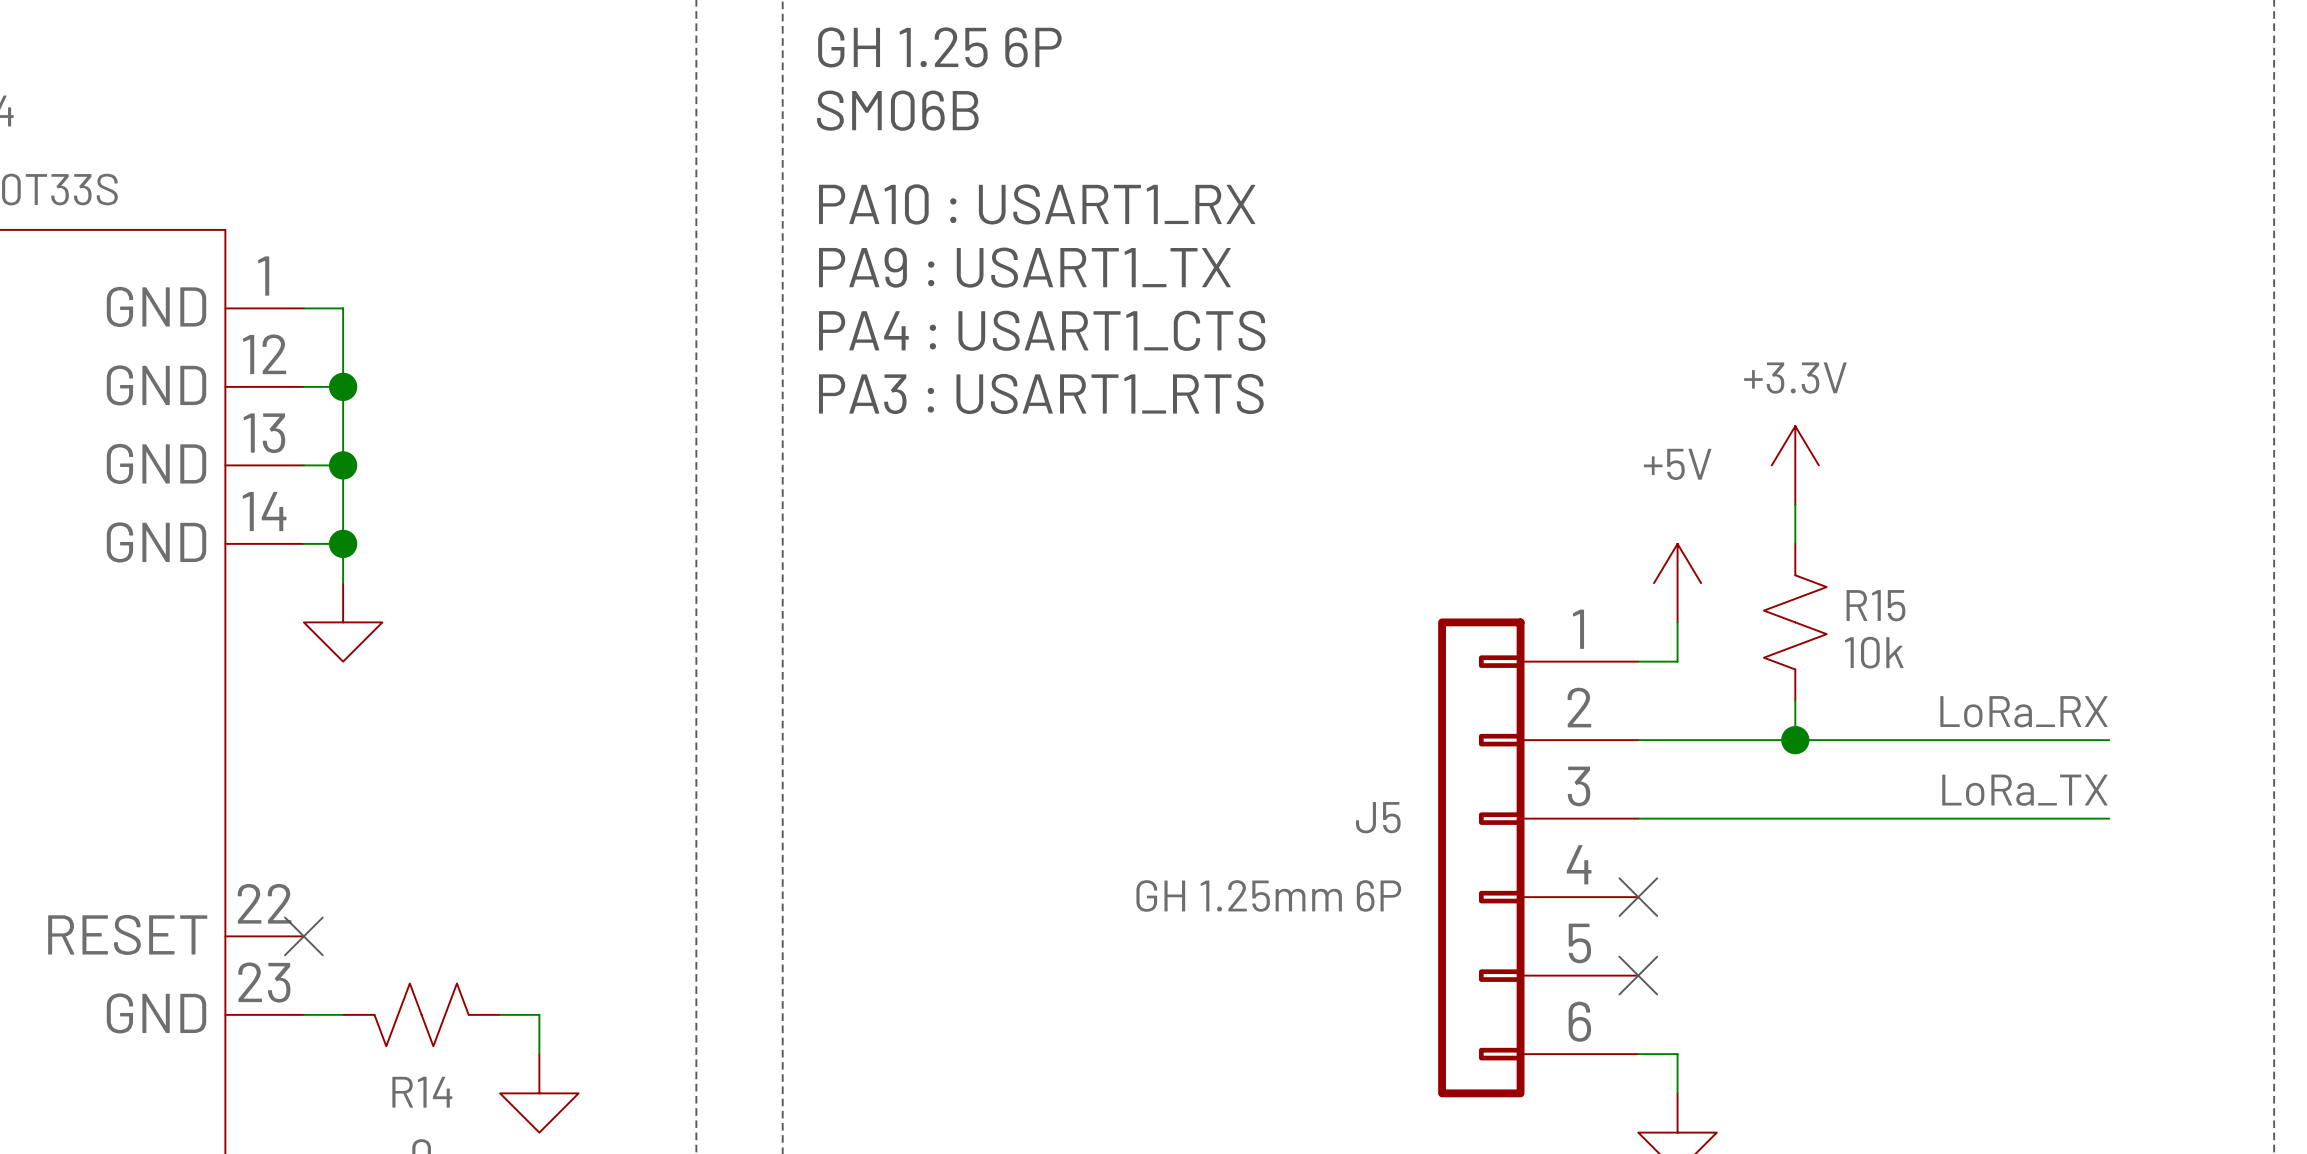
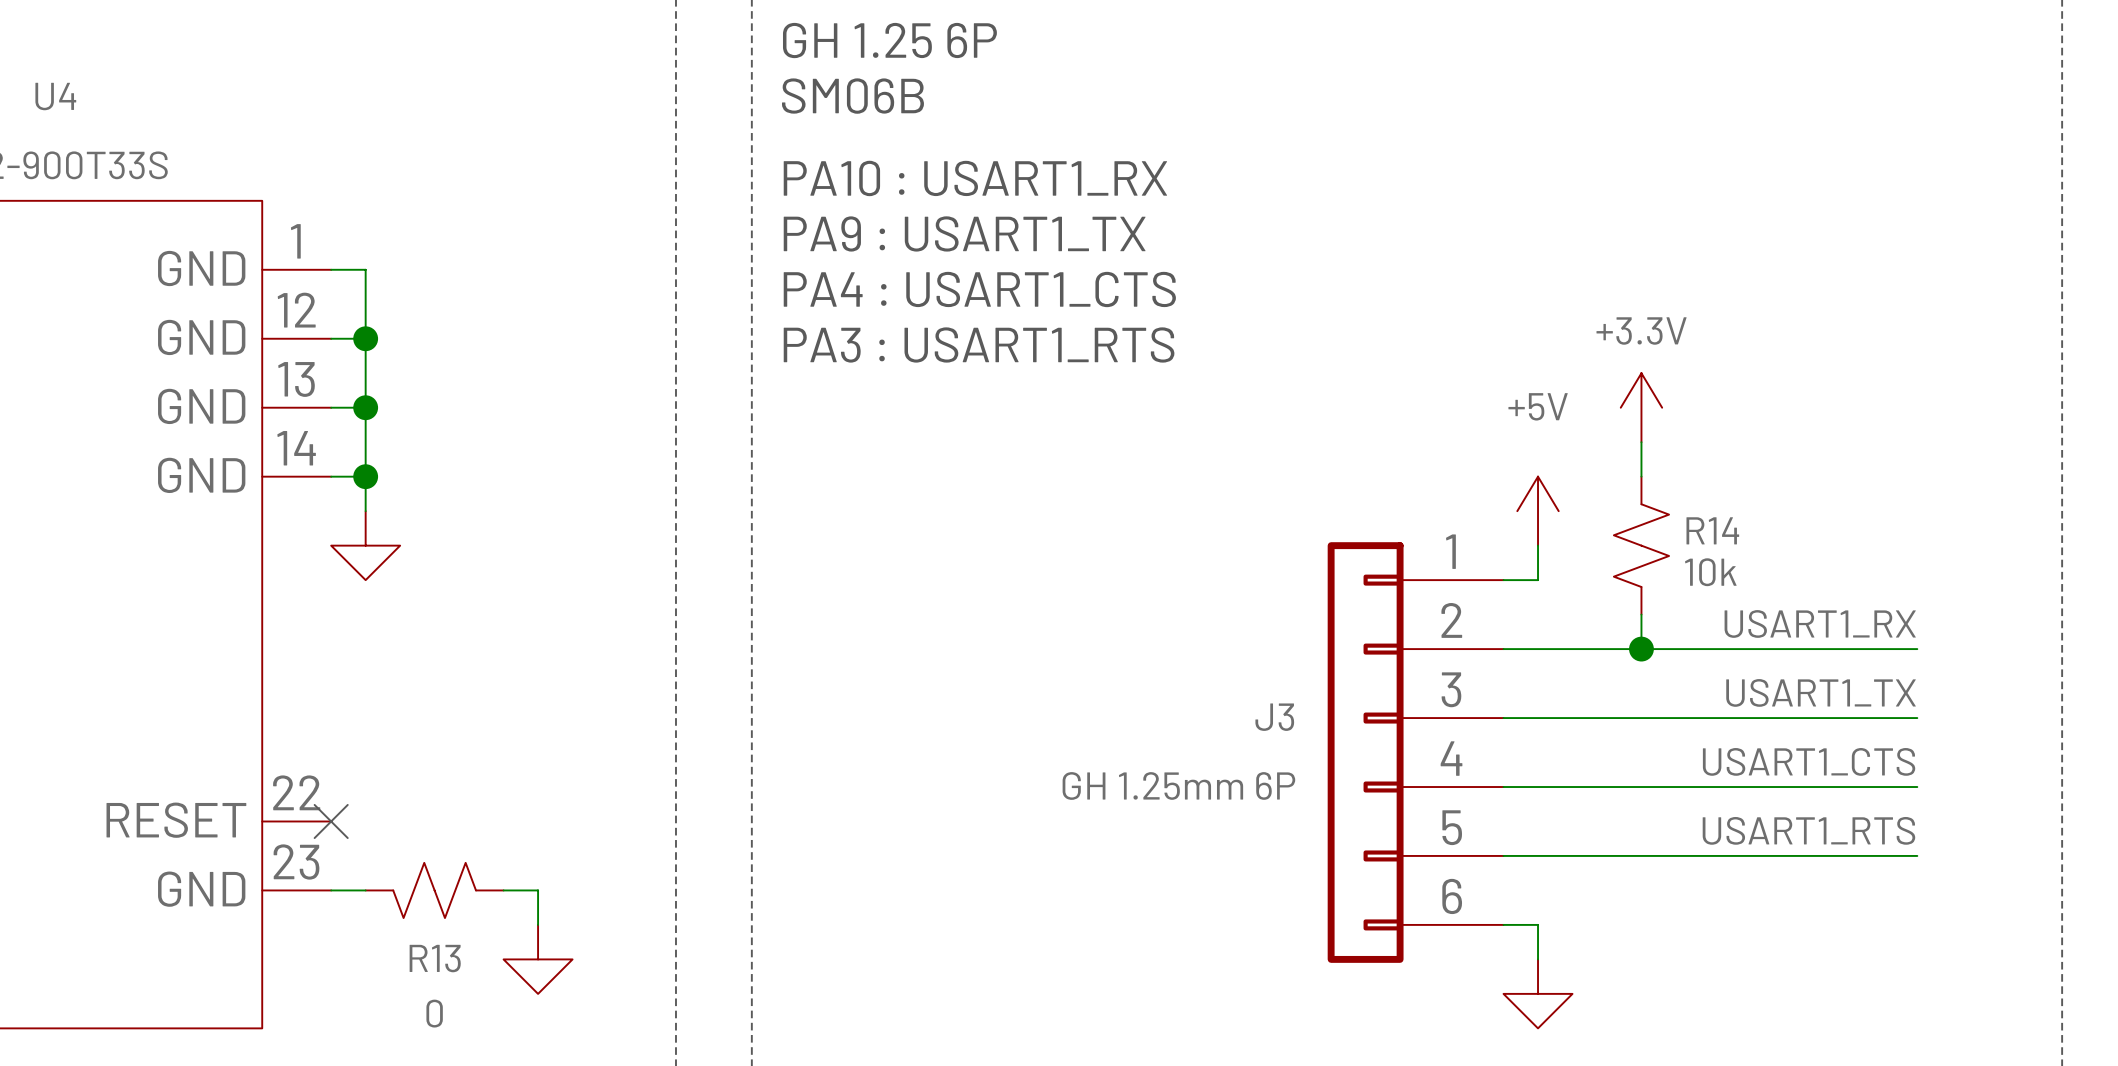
R15 name: R15 (1875, 605) -> R14 (1712, 530)
label: LoRa_RX (2023, 711) -> USART1_RX (1820, 623)
label: LoRa_TX (2024, 790) -> USART1_TX (1821, 692)
J5 name: J5 (1378, 817) -> J3 (1274, 717)
label: none -> USART1_CTS (1809, 761)
wire: none -> (1503, 787) (1917, 787)
no-connect mark: (1638, 897) -> none
label: none -> USART1_RTS (1808, 830)
wire: none -> (1503, 855) (1917, 855)
no-connect mark: (1638, 975) -> none
R14 name: R14 (422, 1092) -> R13 (435, 958)

